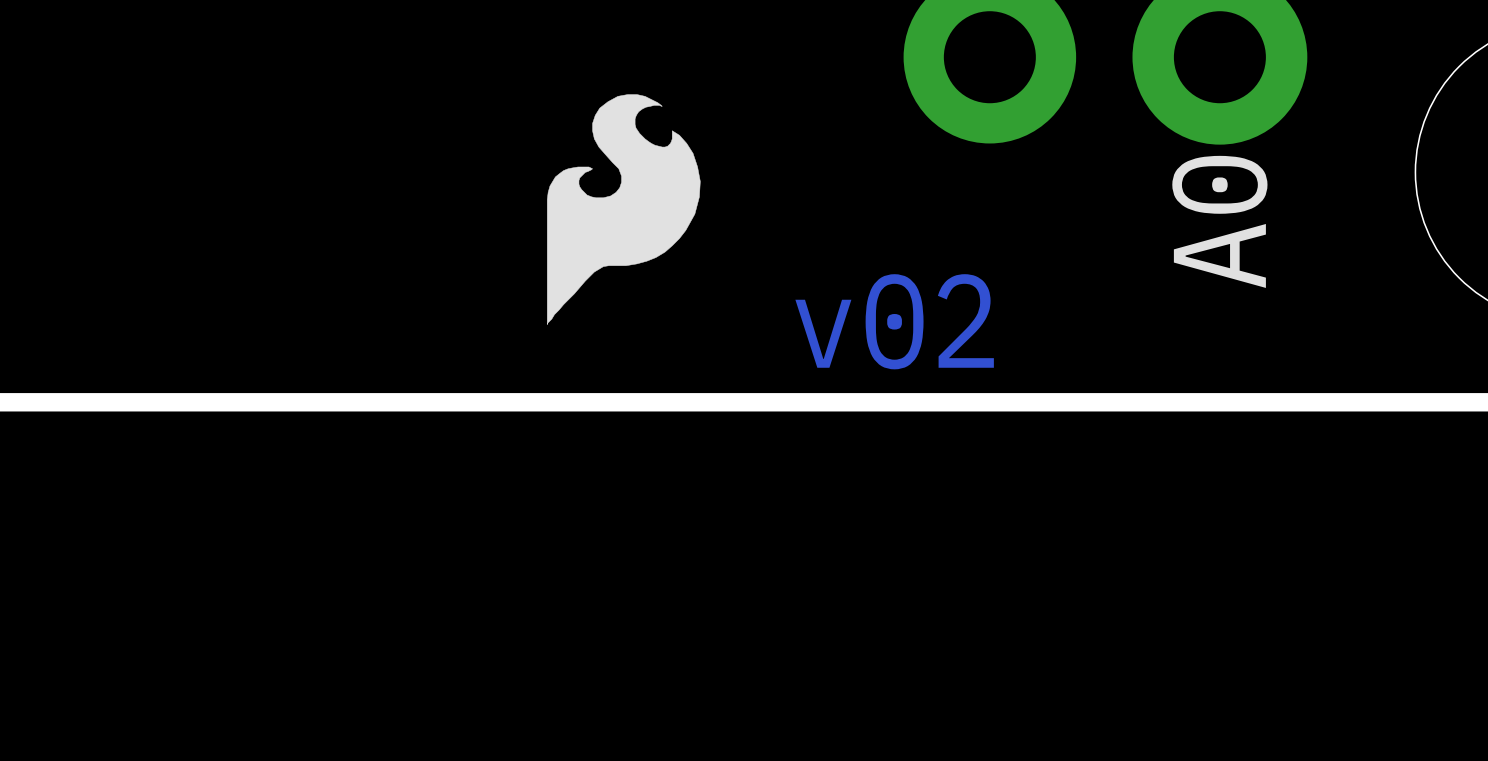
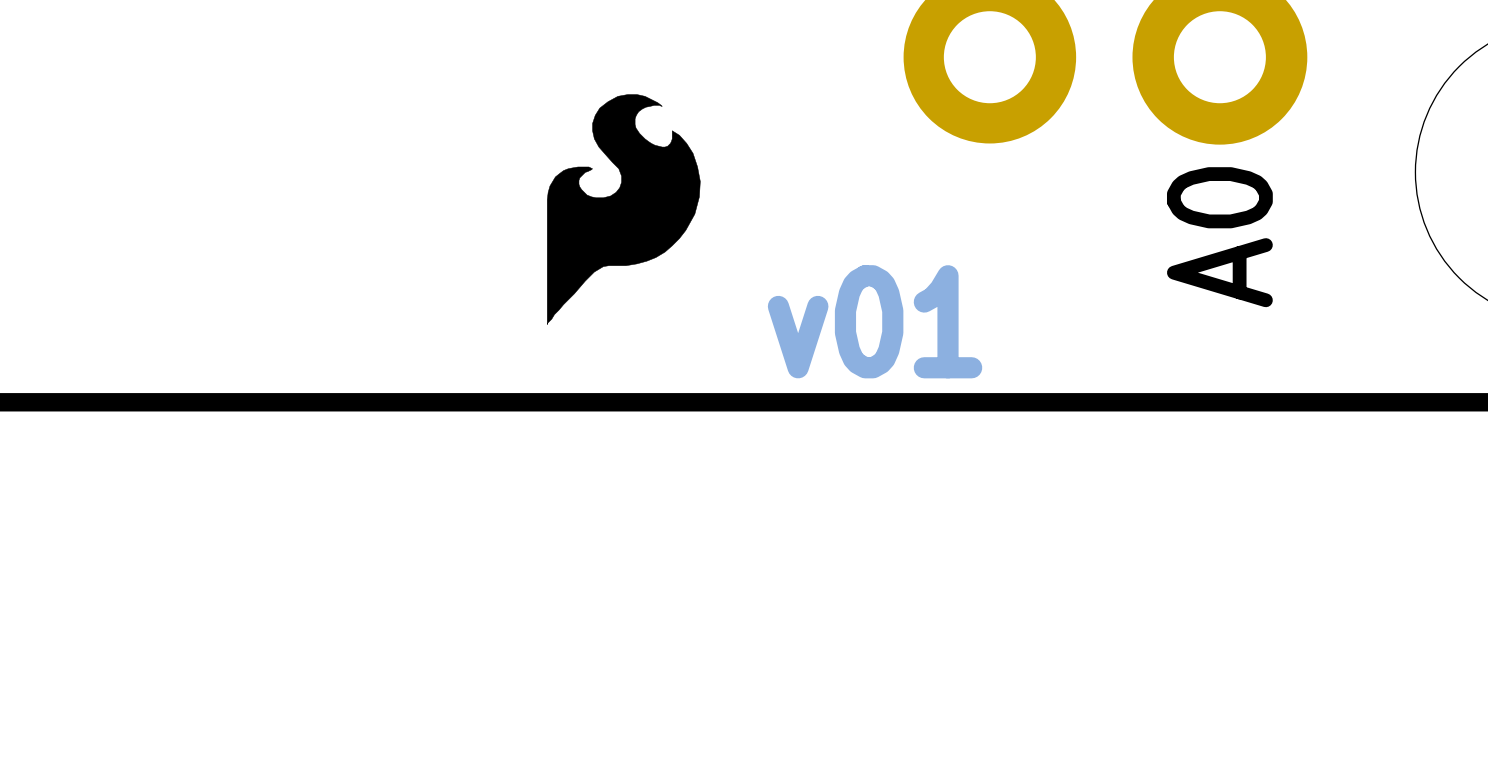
text: v02 (894, 321) -> v01 (875, 321)

